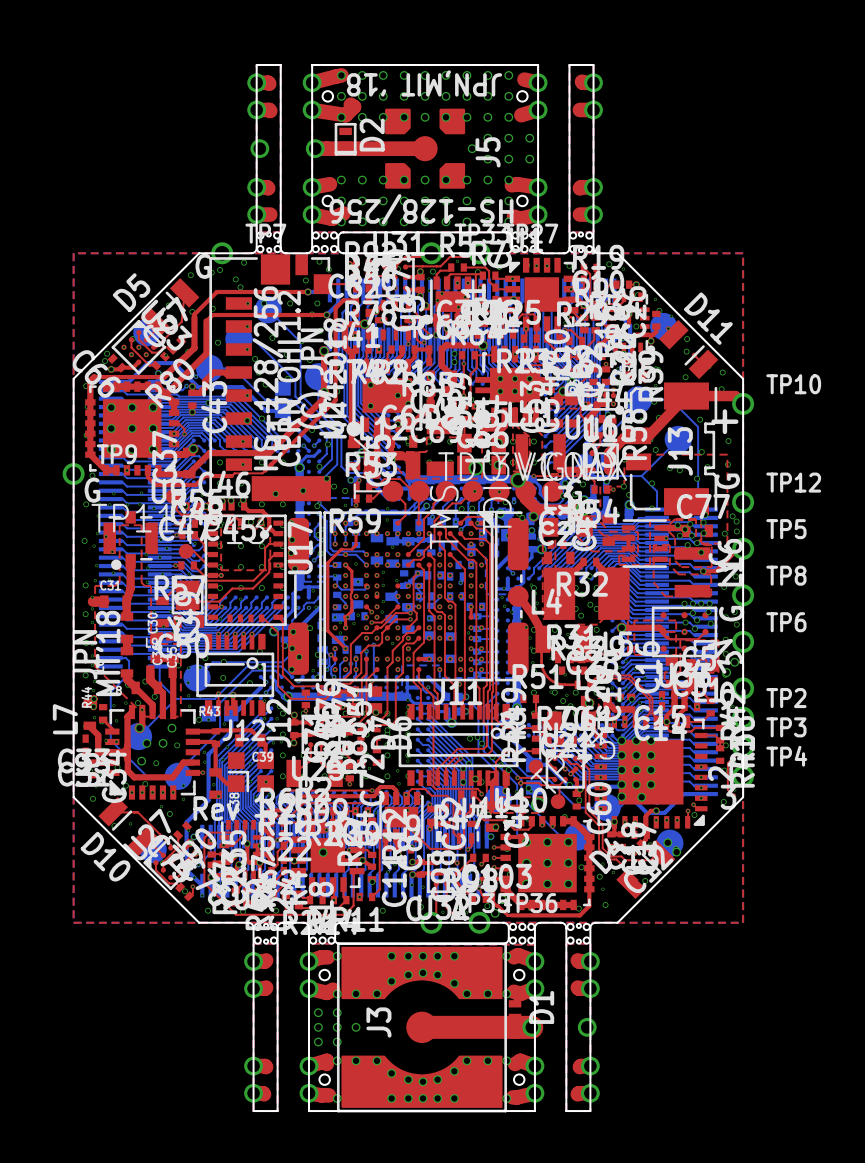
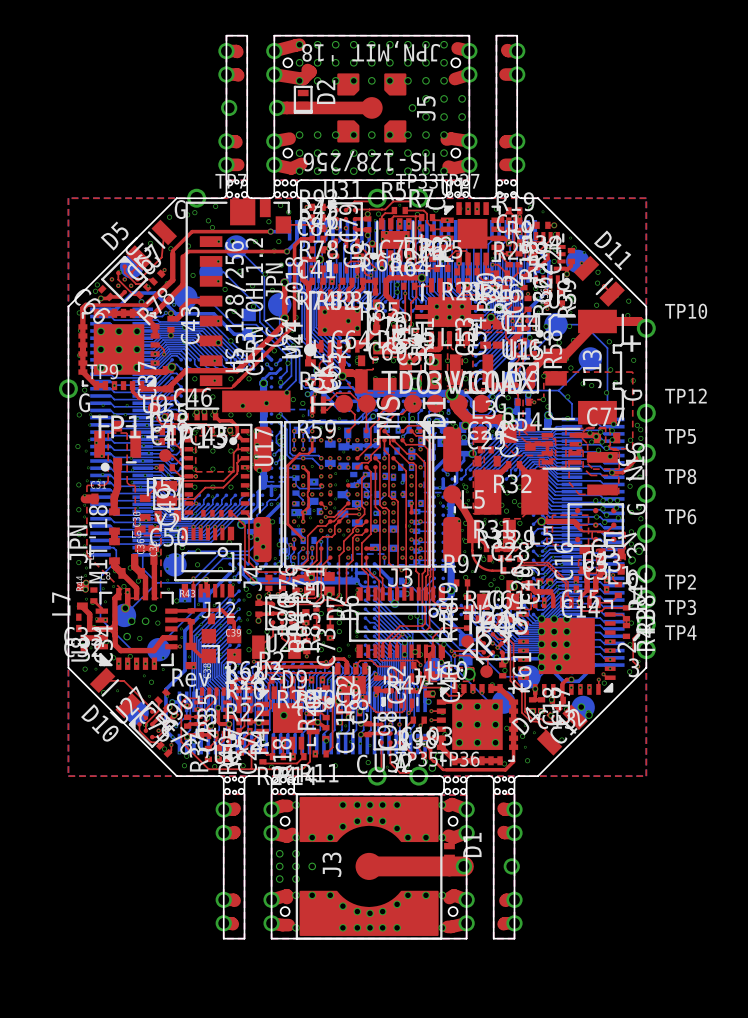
R80 name: R80 (169, 383) -> R78 (155, 306)
L4 name: L4 (546, 601) -> L5 (473, 499)
R51 name: R51 (538, 676) -> R97 (463, 563)
text: J11 (458, 692) -> J3 (400, 577)
text: none -> J4 (252, 578)
text: J12 (278, 723) -> none
C72 name: C72 (372, 780) -> C73 (326, 647)
C60 name: C60 (599, 808) -> C61 (522, 671)

